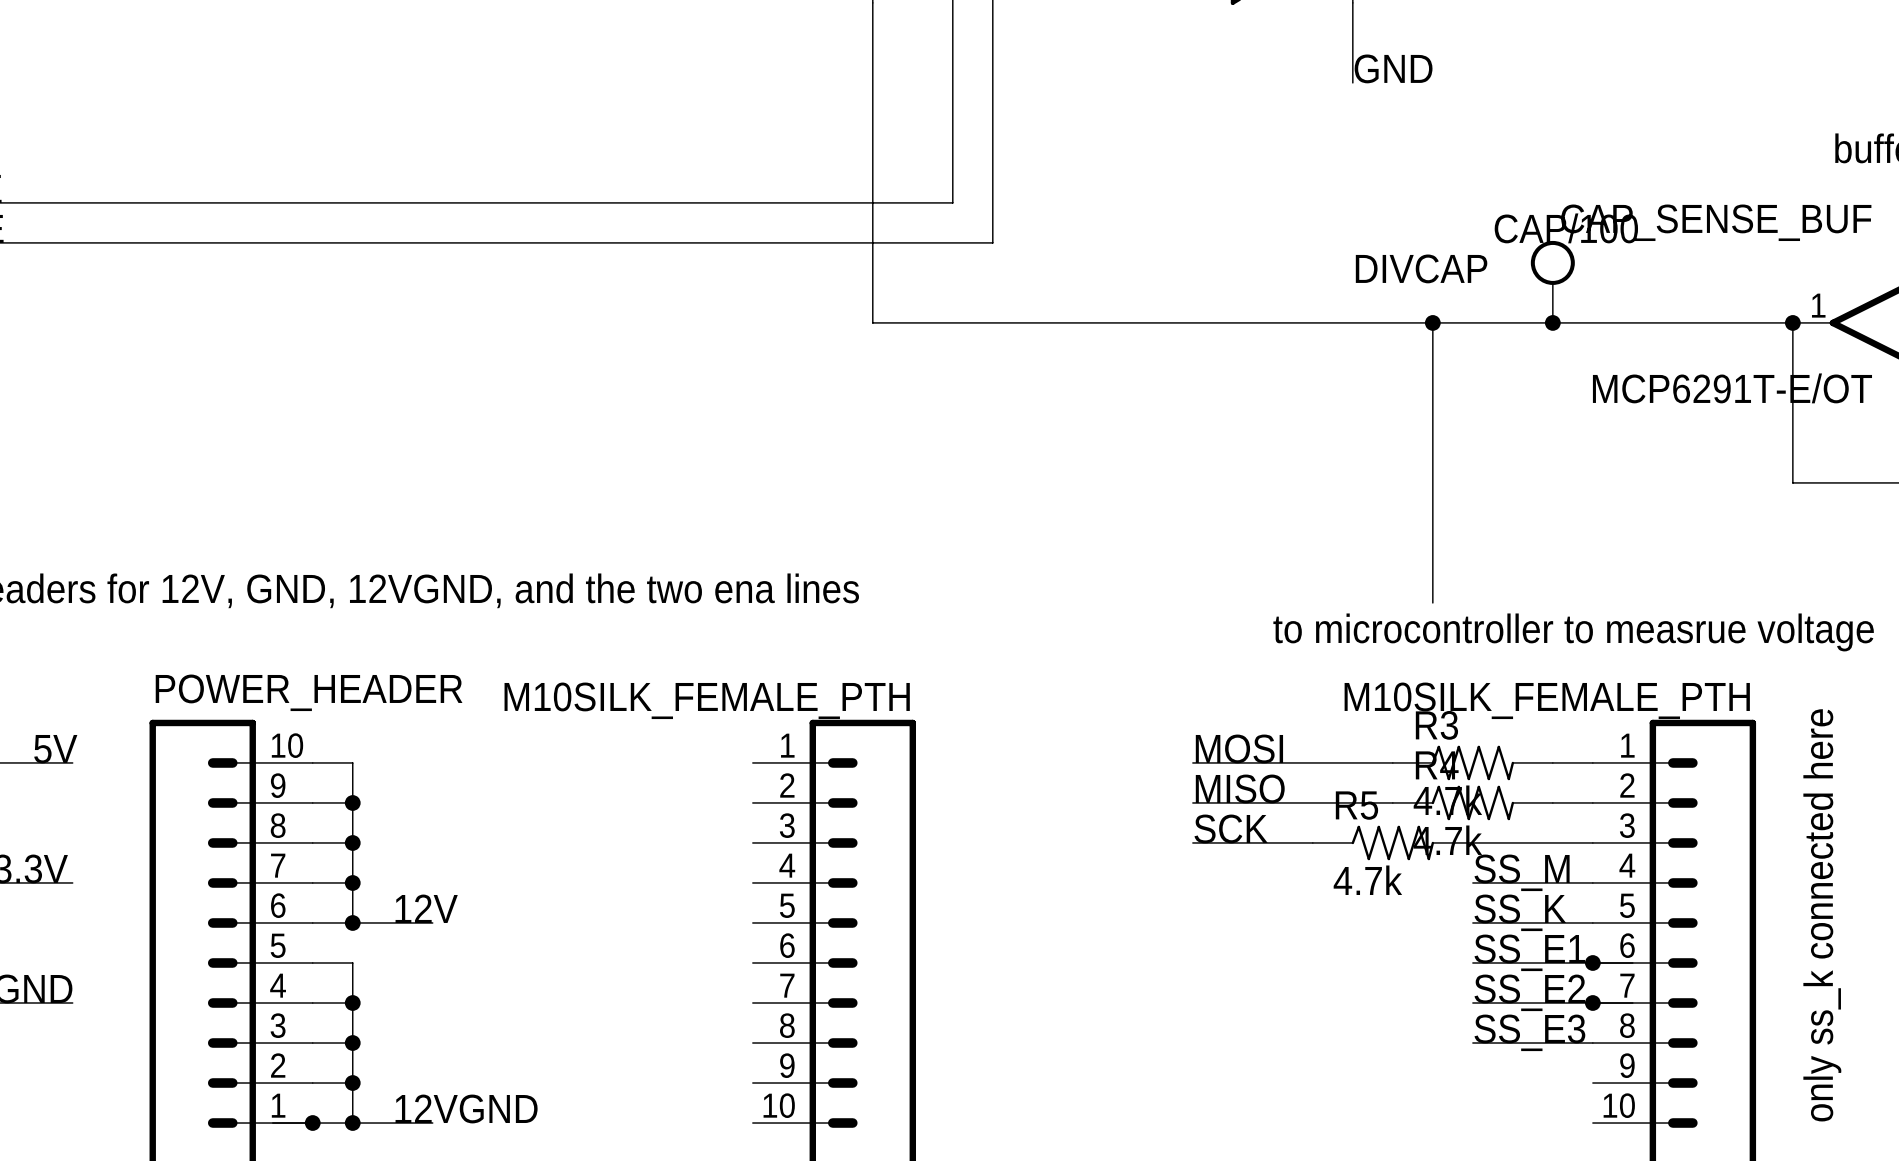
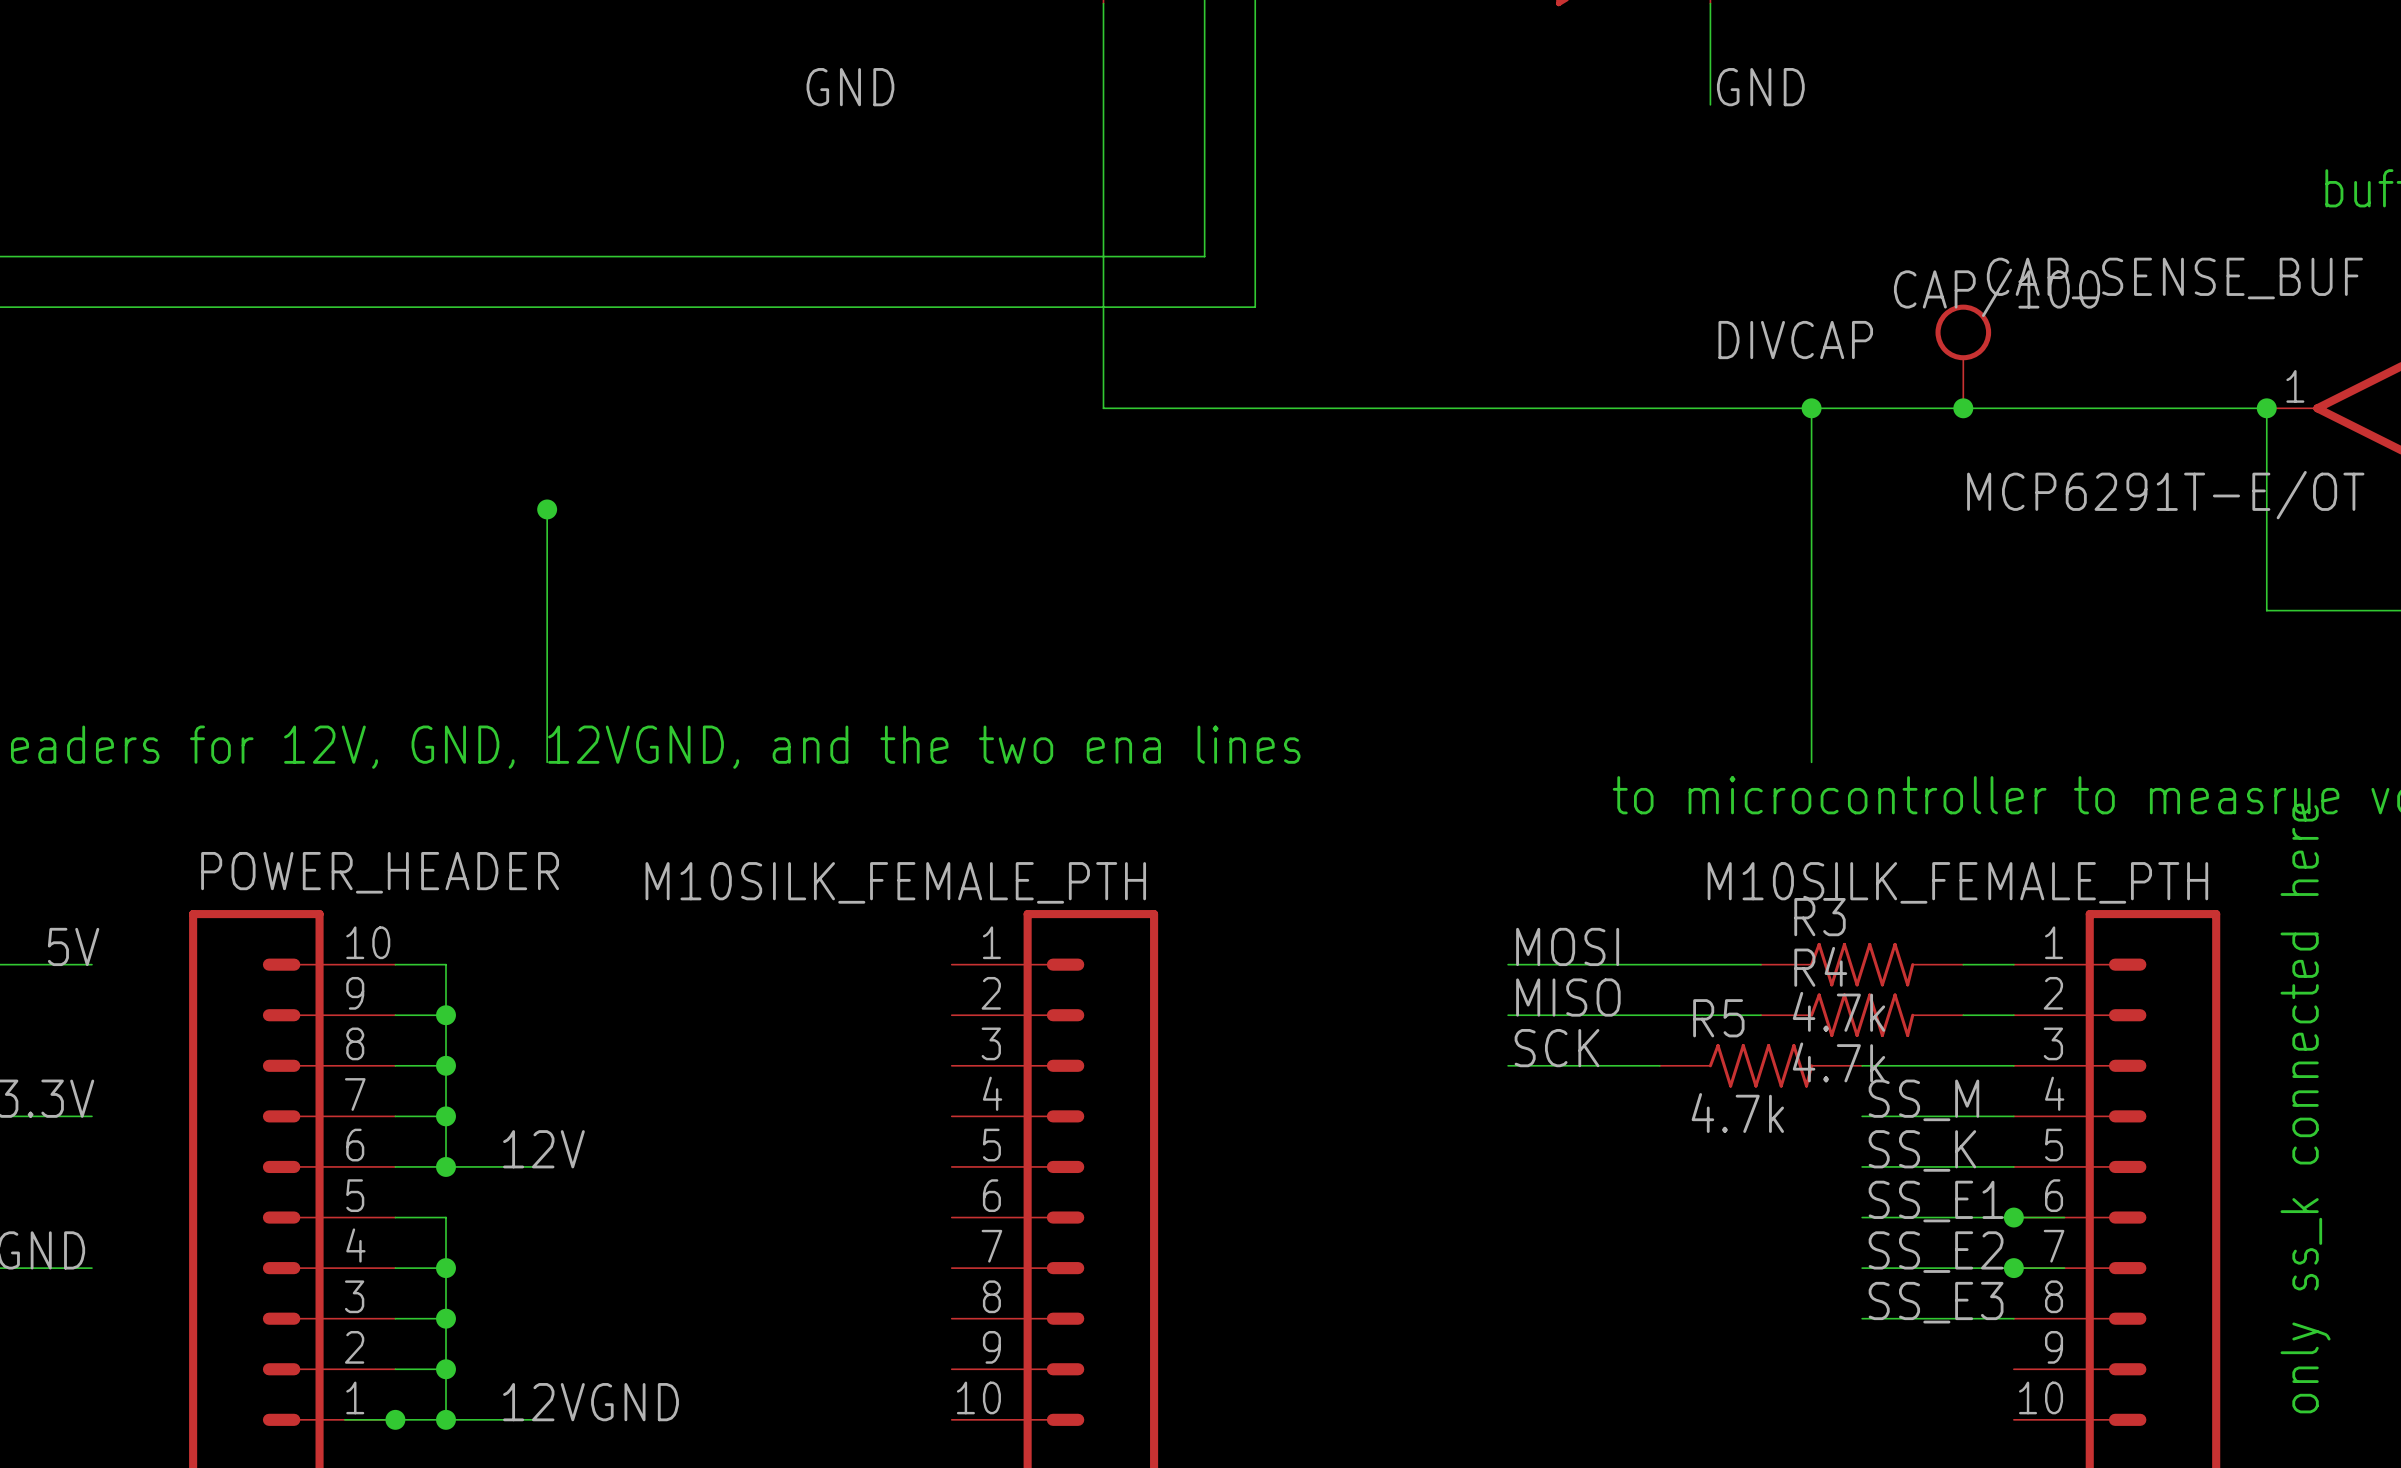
label: none -> GND (850, 87)
wire: none -> (547, 509) (547, 762)
junction: none -> (547, 509)

